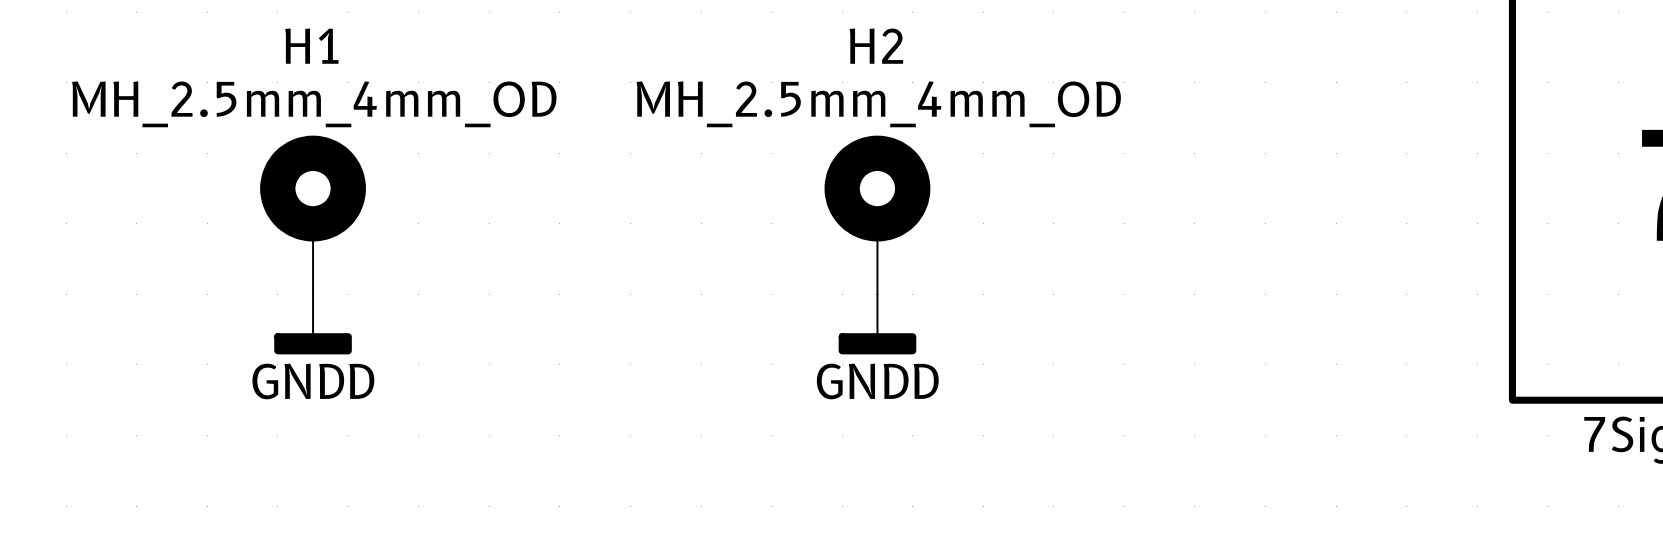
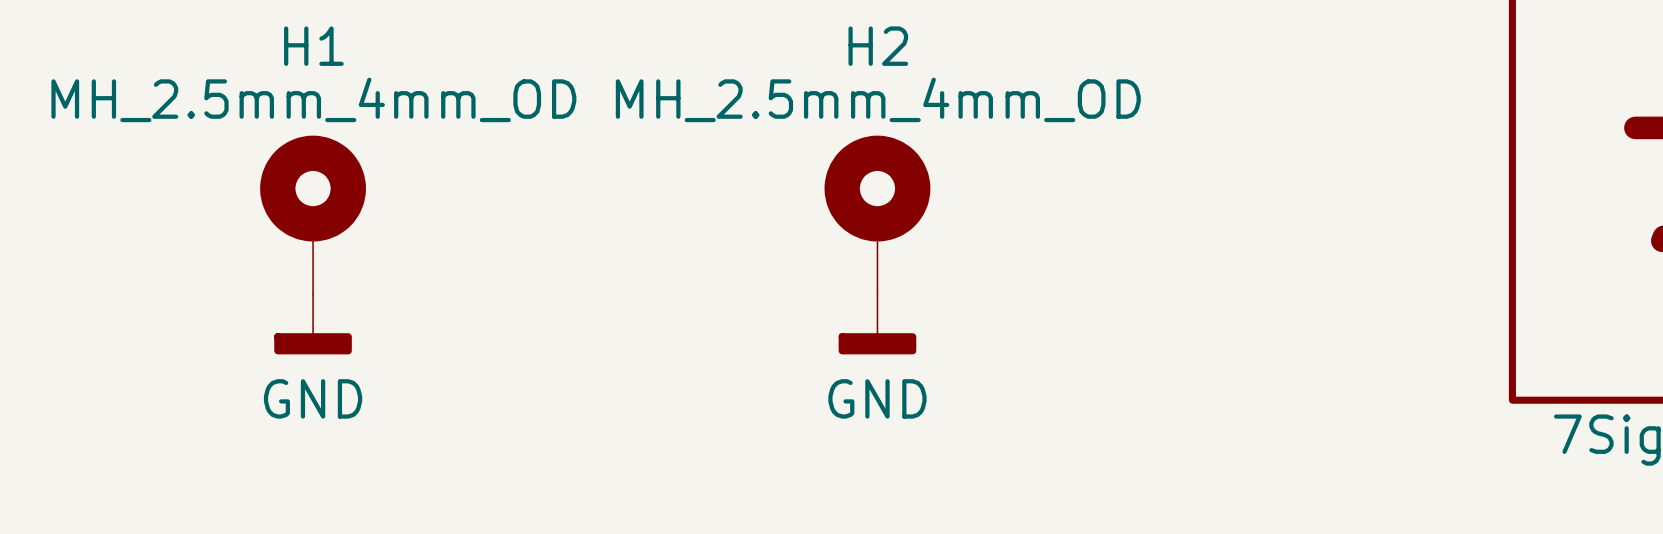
power symbol: GNDD (313, 324) -> GND (313, 324)
power symbol: GNDD (877, 324) -> GND (877, 324)

